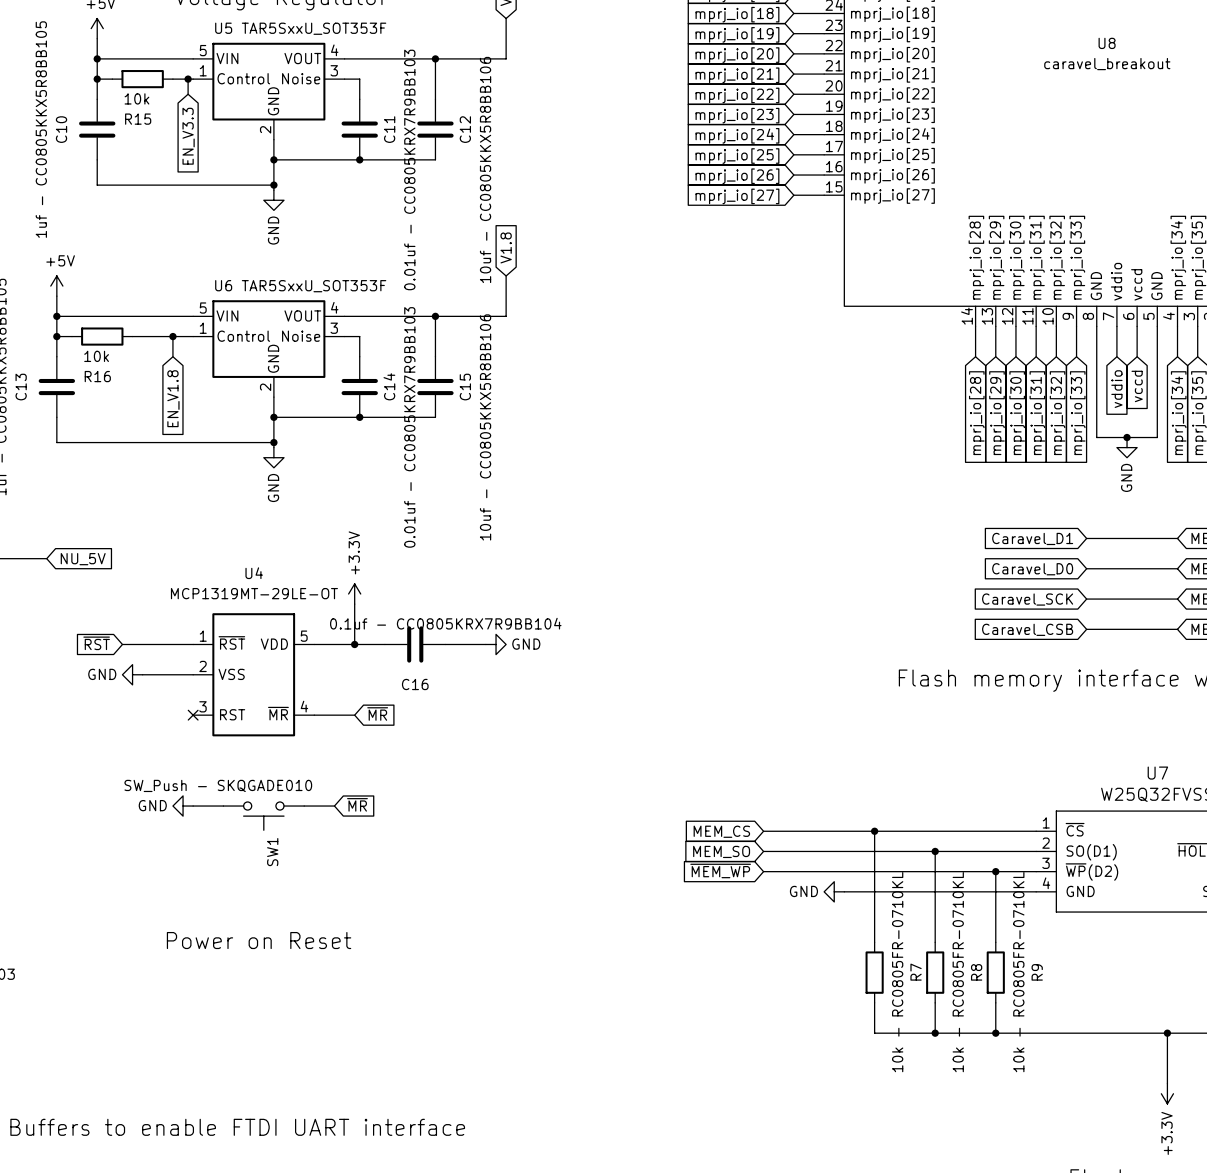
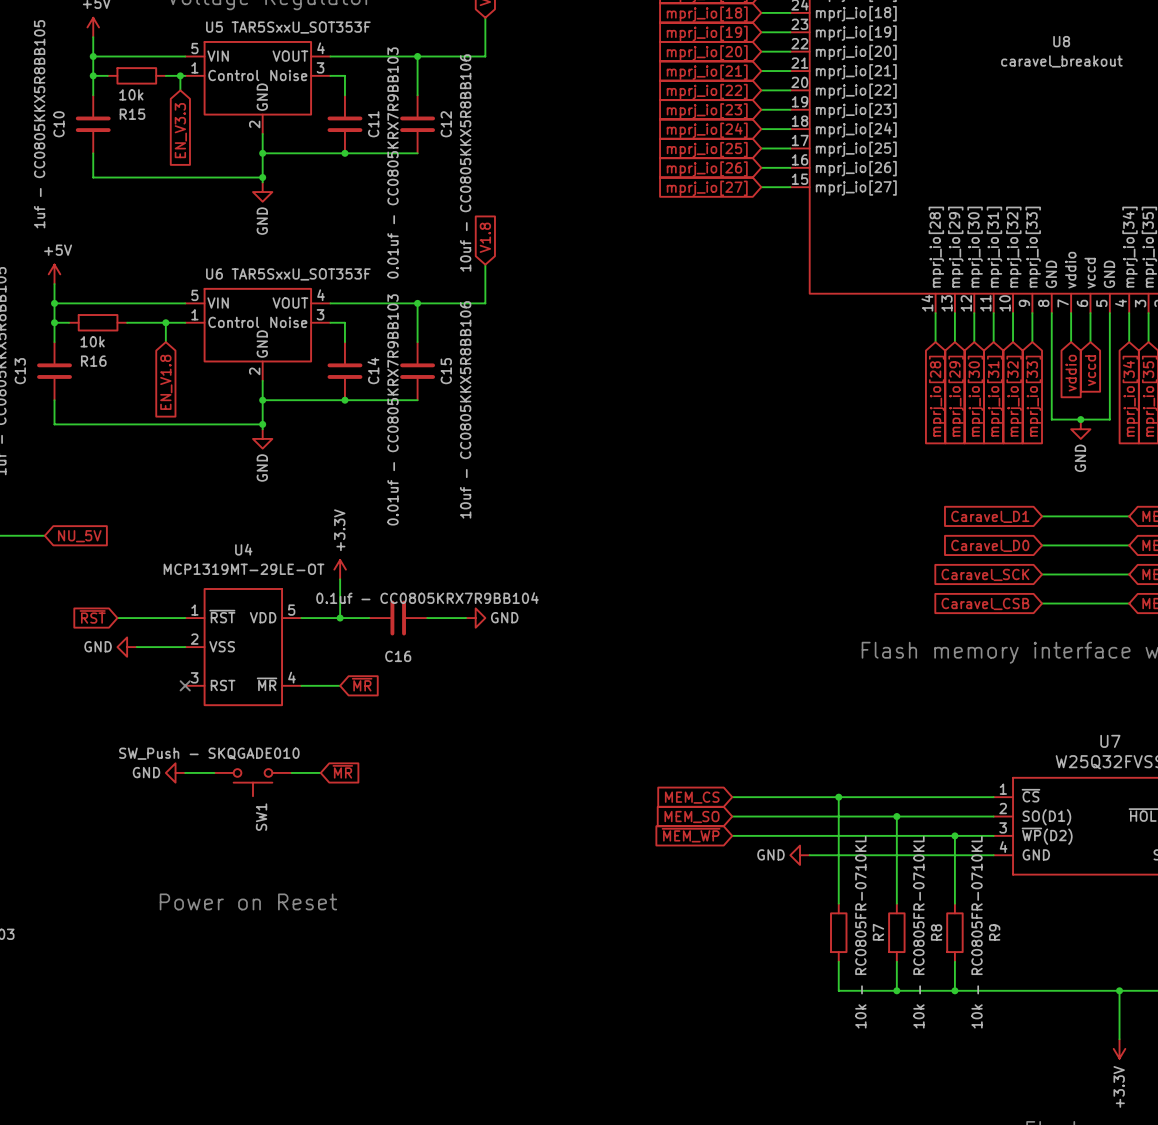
text: Buffers to enable FTDI UART interface (237, 1127) -> none

